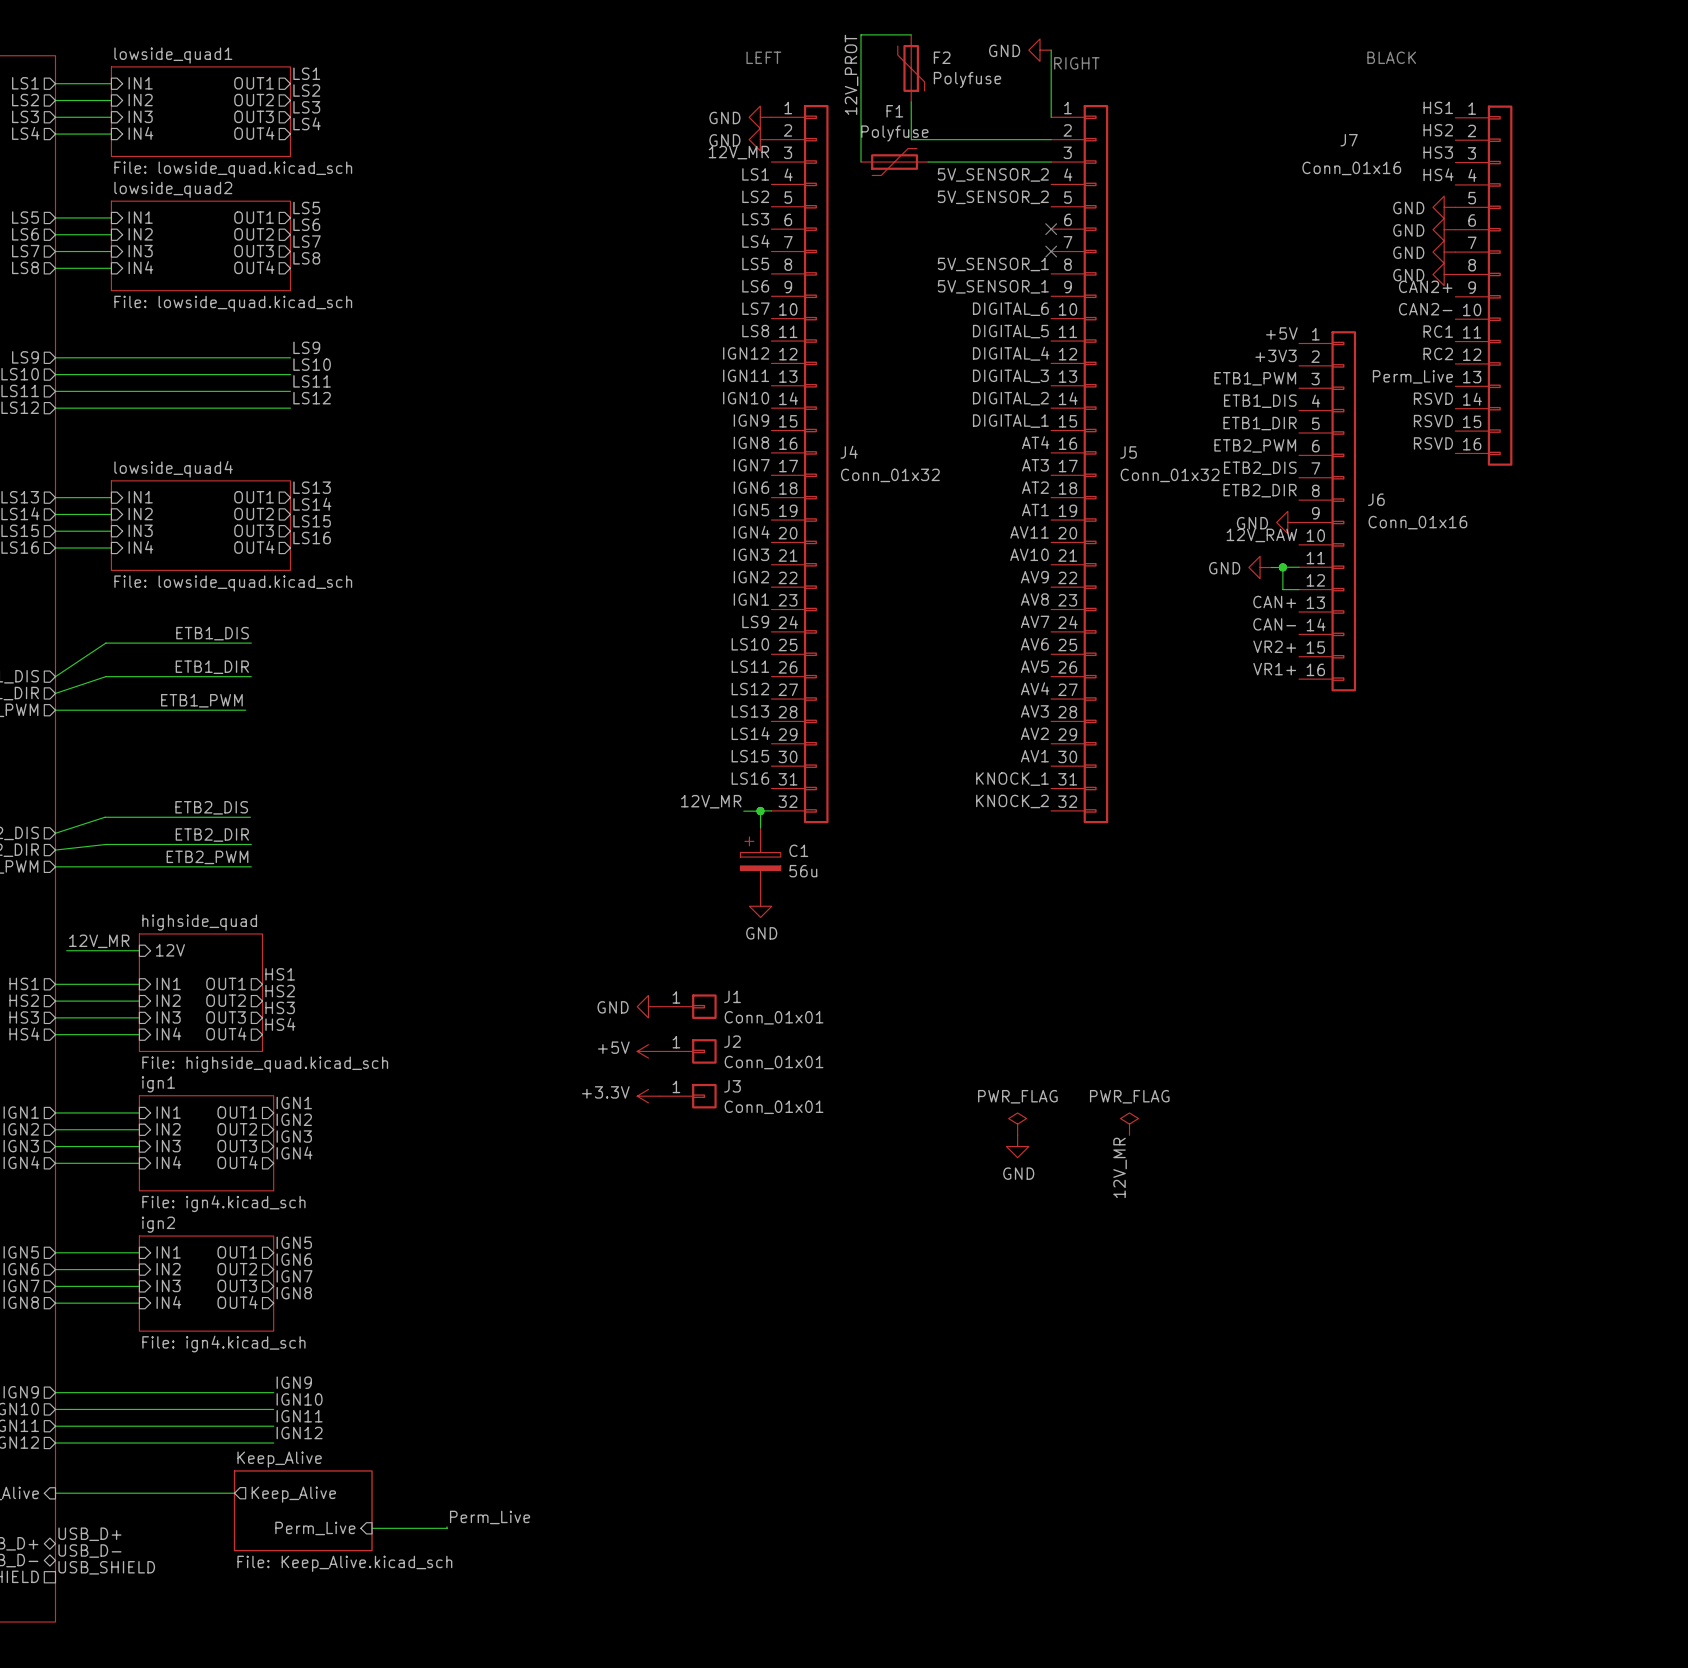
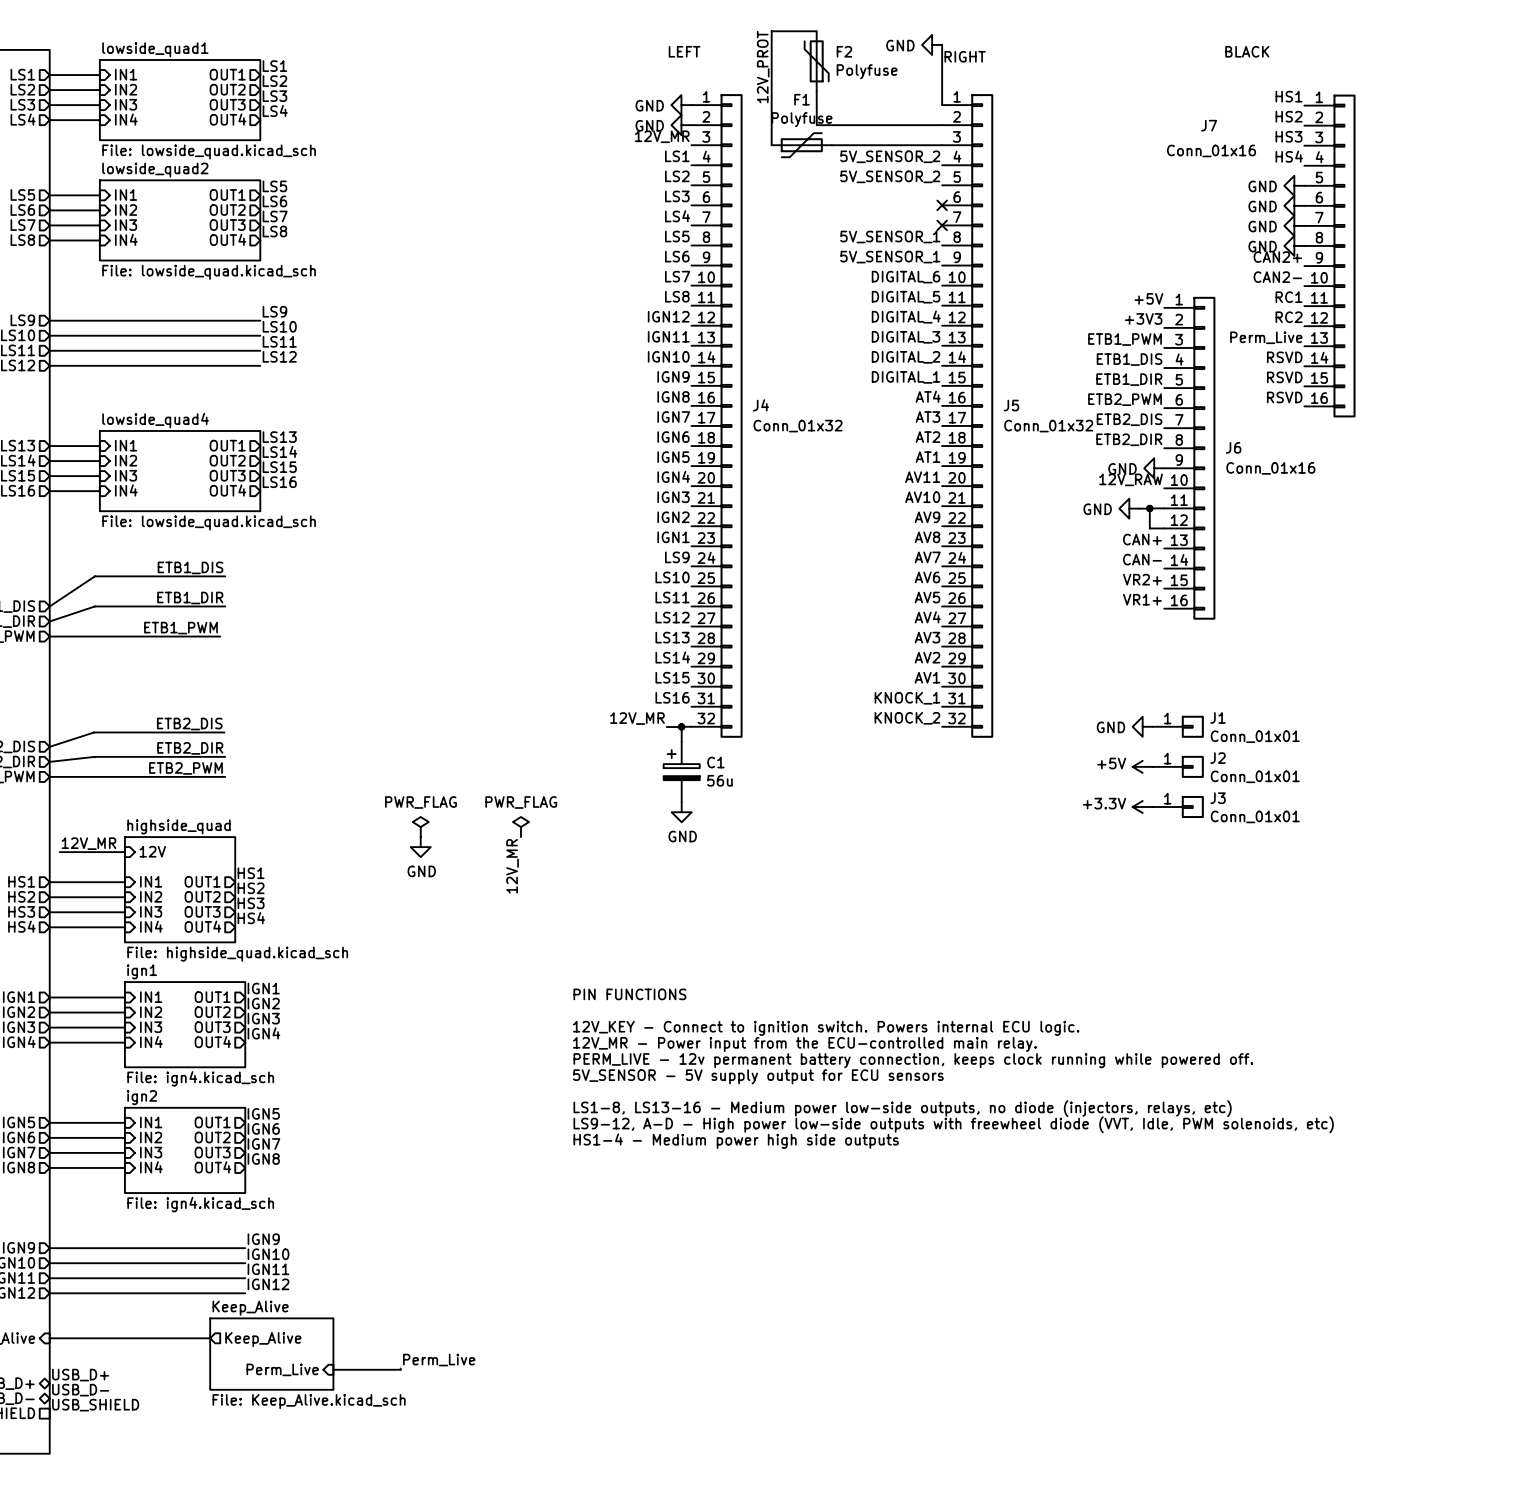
power symbol: none -> GND (1142, 726)
power symbol: none -> +5V (1142, 766)
power symbol: none -> +3.3V (1142, 807)
power symbol: none -> PWR_FLAG (420, 827)
power symbol: none -> PWR_FLAG (521, 827)
label: none -> 12V_MR (512, 866)
power symbol rotation: 0° (648, 1006) -> 90° counterclockwise (420, 847)
power symbol position: GND (648, 1006) -> GND (420, 847)
J1 position: (688, 1006) -> (1178, 726)
power symbol: +5V (648, 1051) -> none
J2 position: (688, 1051) -> (1178, 766)
power symbol: +3.3V (648, 1096) -> none
J3 position: (688, 1096) -> (1178, 807)
text: none -> PIN FUNCTIONS (629, 994)
power symbol: PWR_FLAG (1017, 1124) -> none
power symbol: PWR_FLAG (1129, 1124) -> none
power symbol: GND (1017, 1146) -> none
text: none -> 12V_KEY - Connect to ignition switch. Powers internal ECU logic. (826, 1028)
text: none -> 12V_MR - Power input from the ECU-controlled main relay. (804, 1044)
label: 12V_MR (1120, 1167) -> none
text: none -> PERM_LIVE - 12v permanent battery connection, keeps clock running while powered off. (913, 1060)
text: none -> 5V_SENSOR - 5V supply output for ECU sensors (758, 1076)
text: none -> LS1-8, LS13-16 - Medium power low-side outputs, no diode (injectors, relays, etc) (902, 1108)
text: none -> LS9-12, A-D - High power low-side outputs with freewheel diode (VVT, Idle, PWM solenoids, etc) (953, 1124)
text: none -> HS1-4 - Medium power high side outputs (736, 1141)

